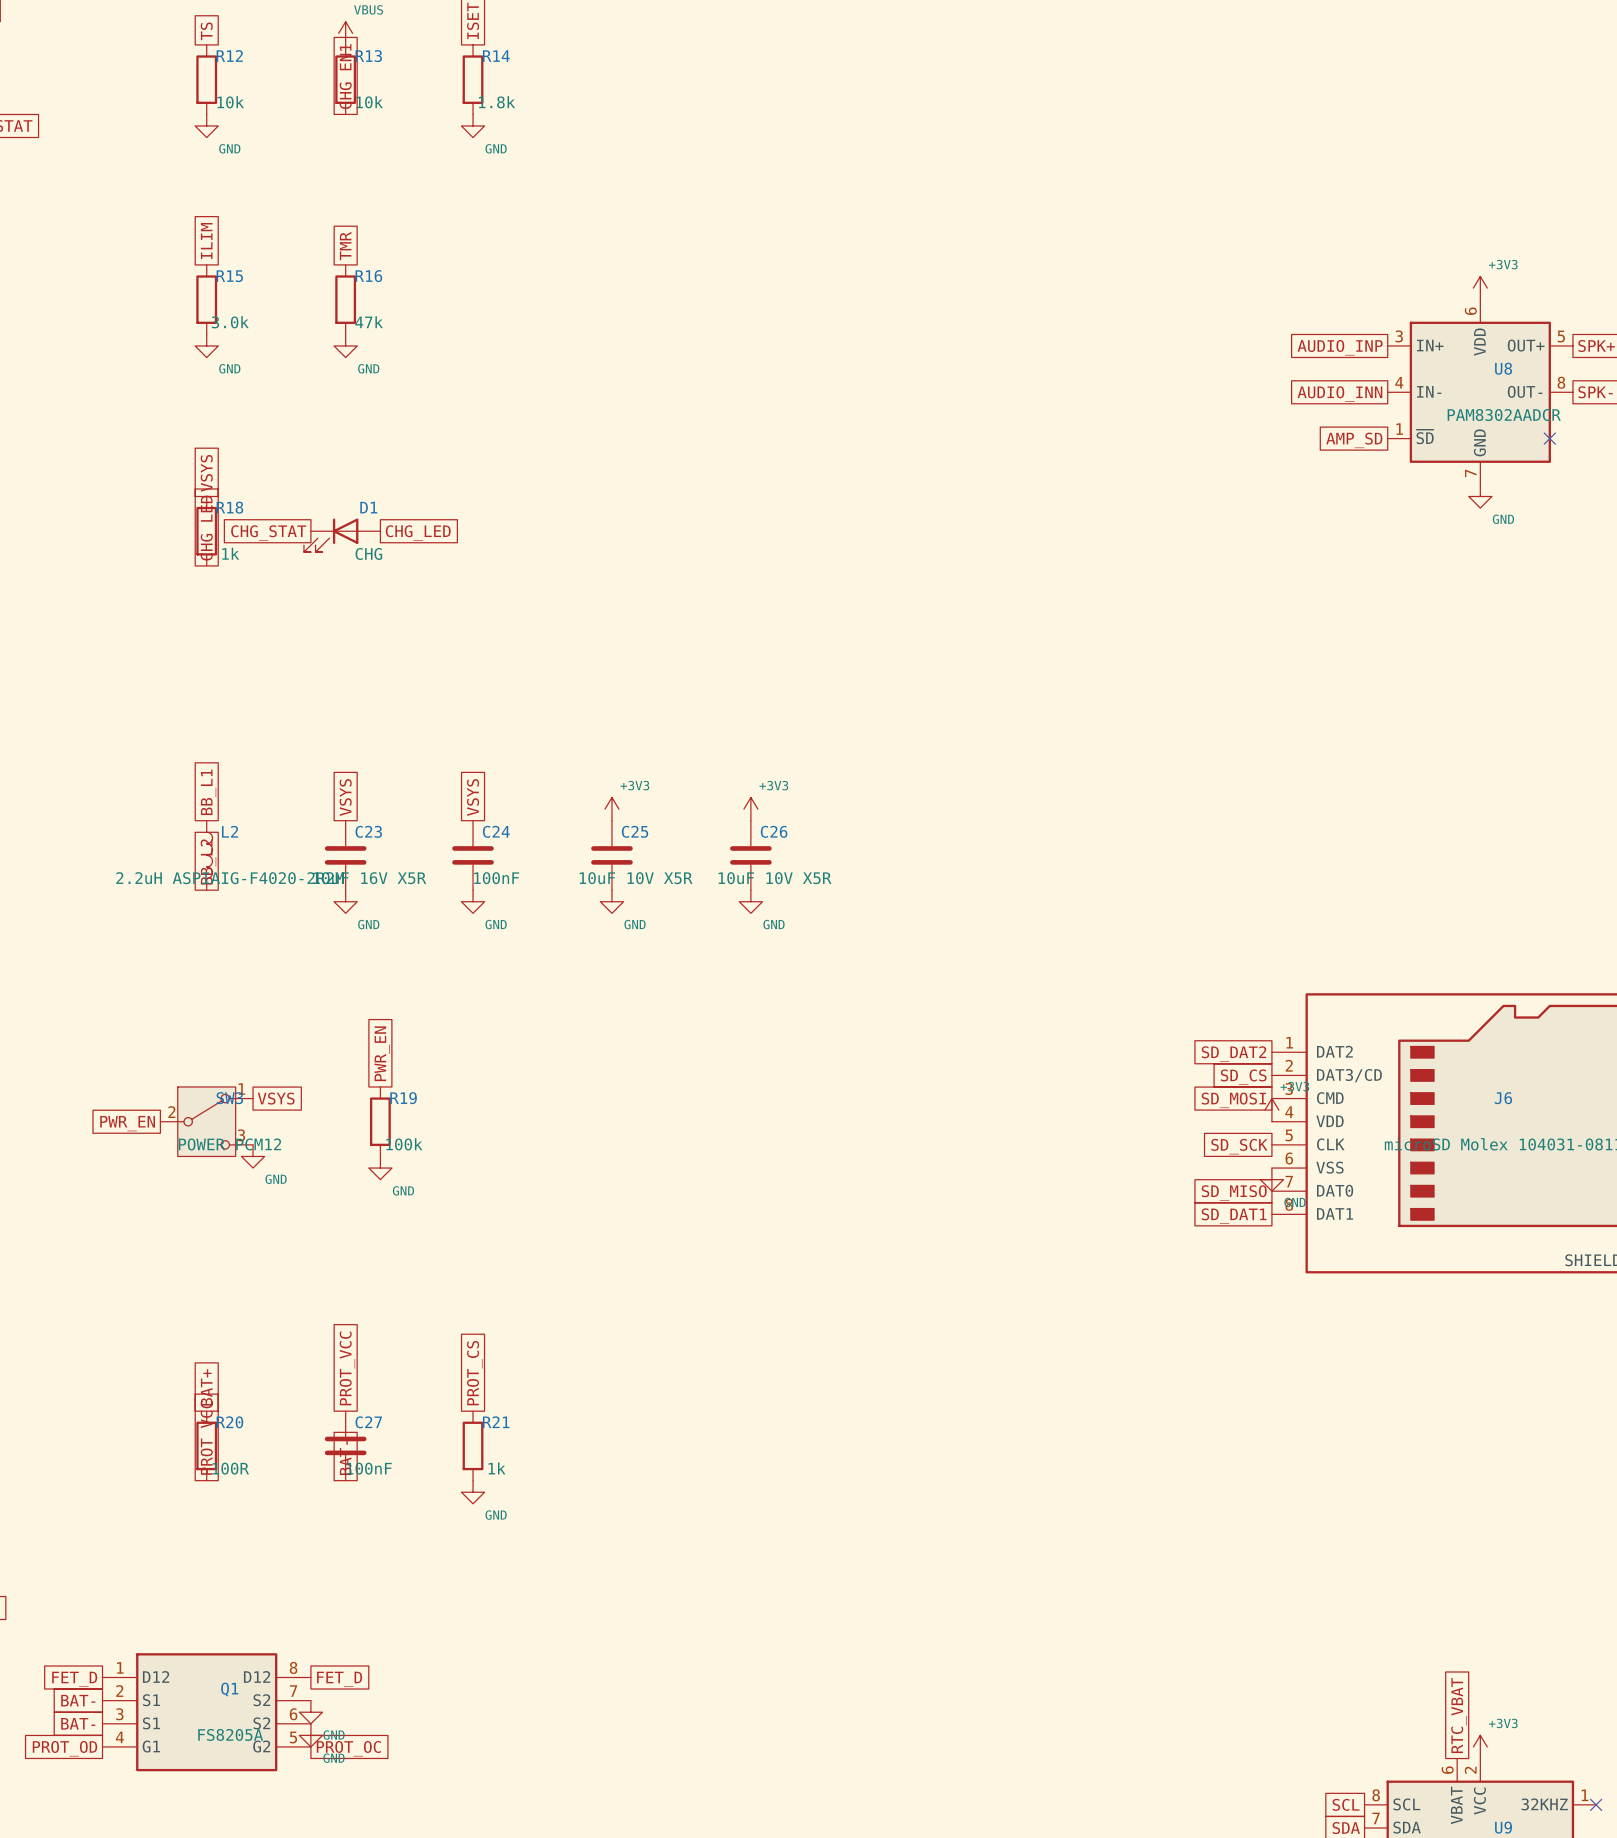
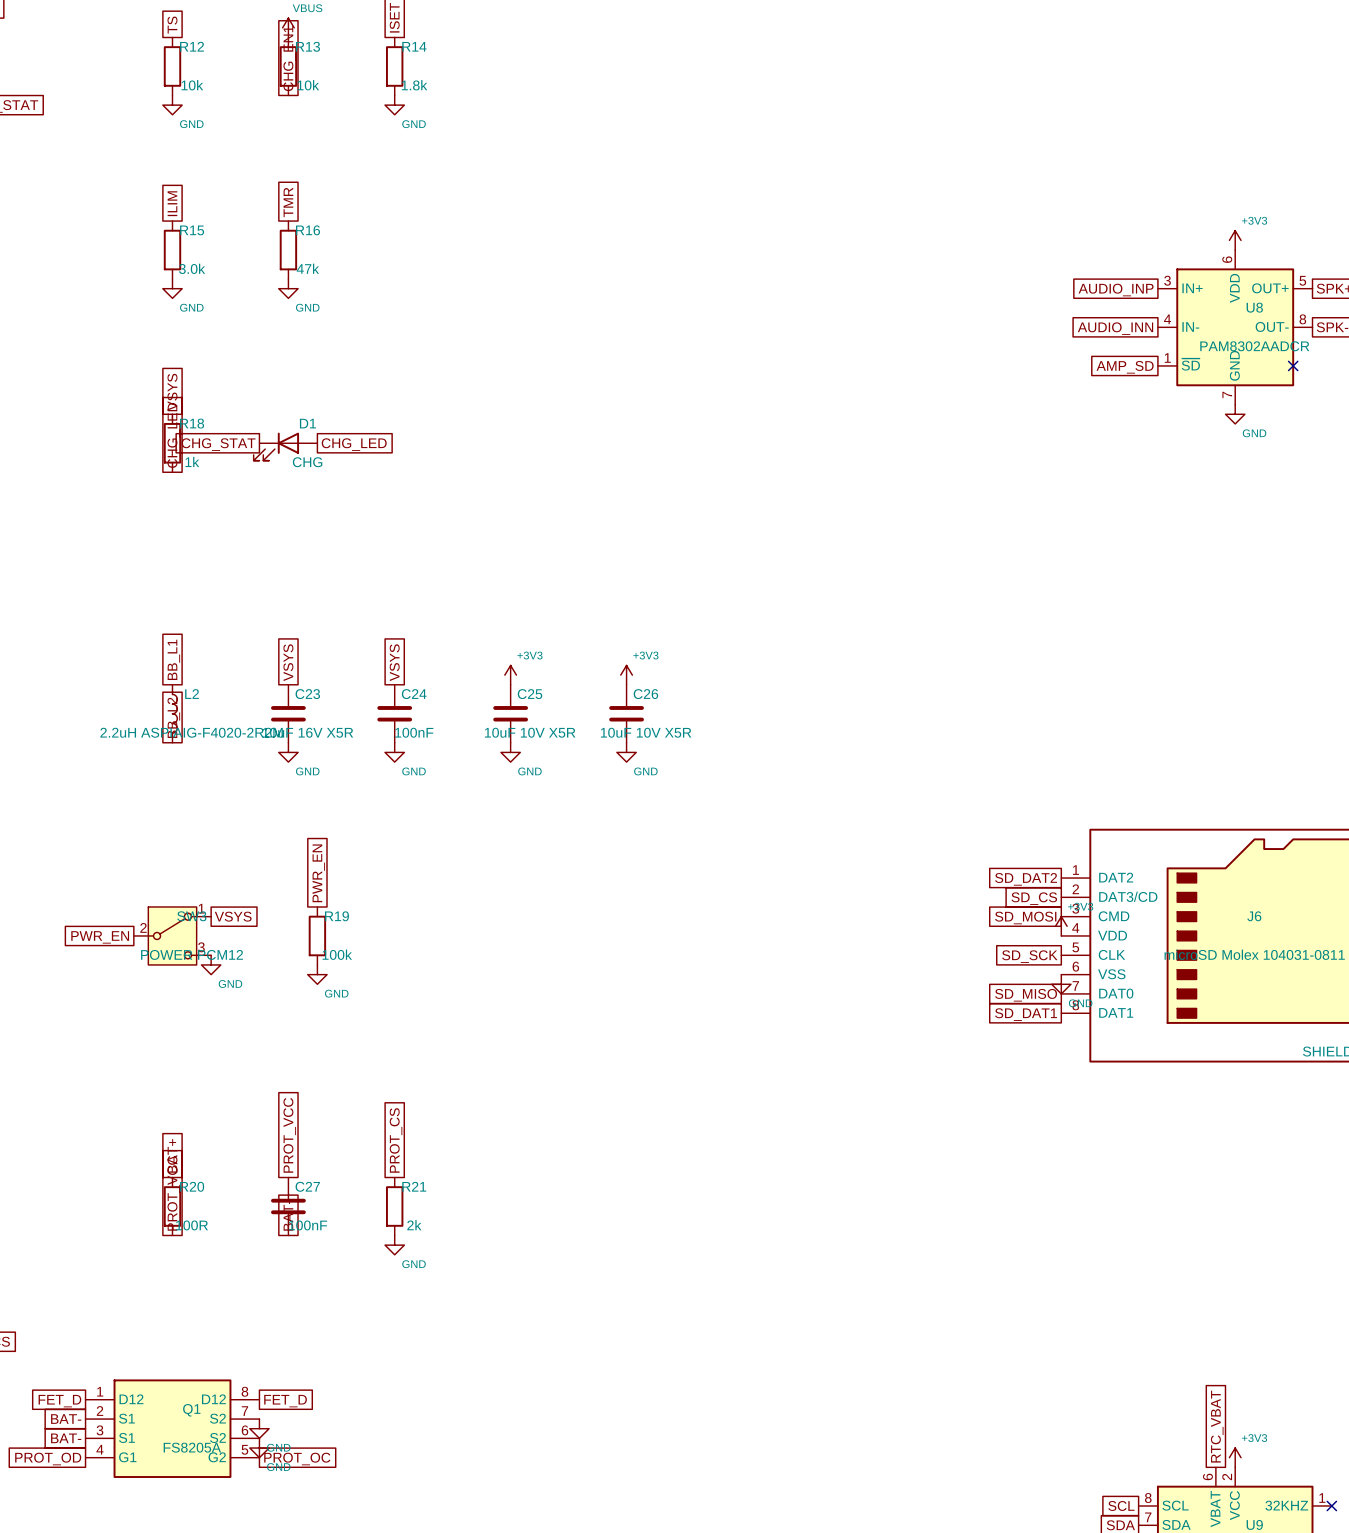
R21 value: 1k (497, 1468) -> 2k (414, 1225)

